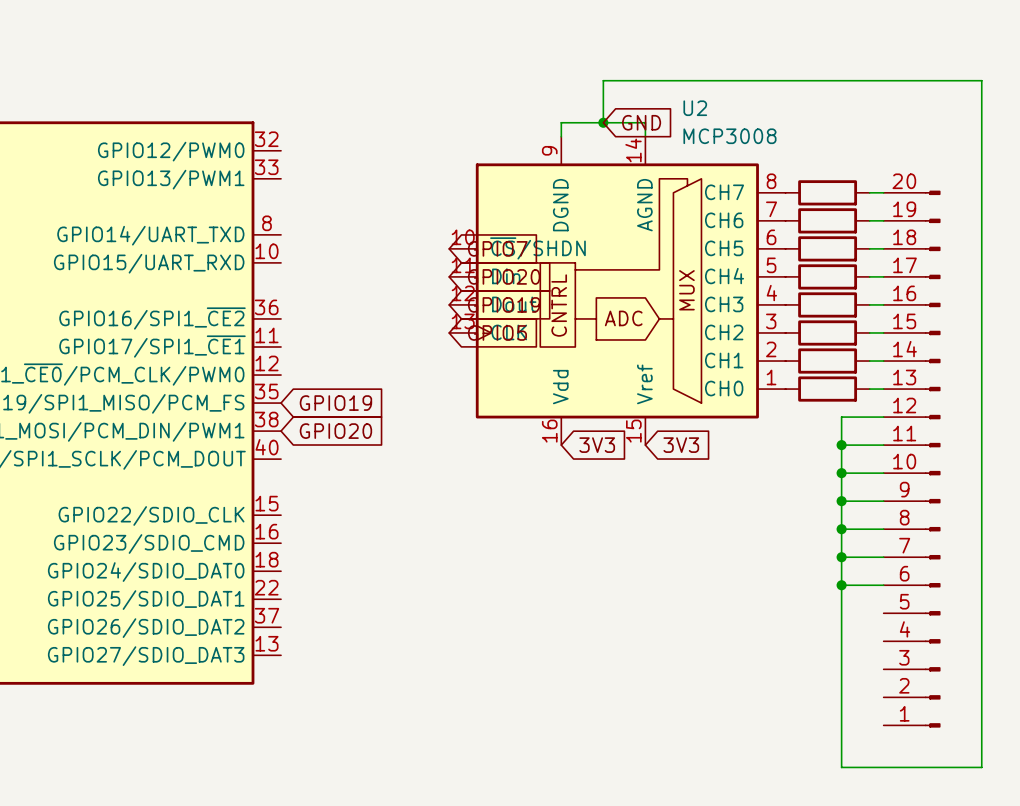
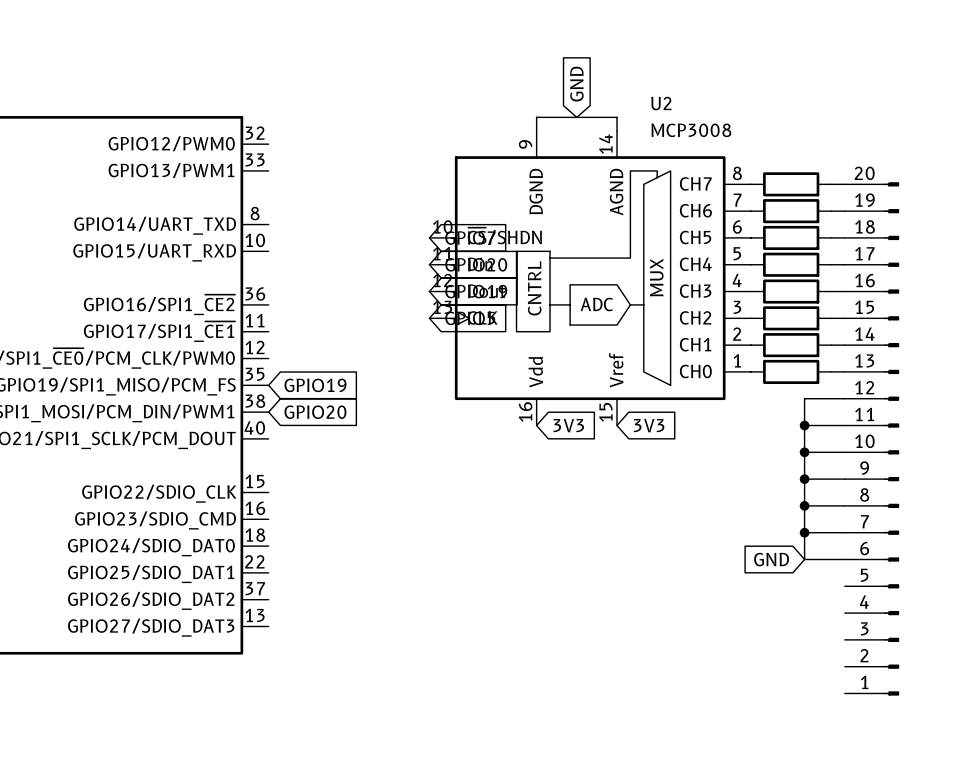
wire: (603, 122) (603, 80) (981, 80) (981, 767) (841, 767) (841, 585) -> none
junction: (603, 122) -> none
global label rotation: 0° (641, 122) -> 90° counterclockwise (576, 84)
global label: none -> GND (771, 559)
junction: (841, 585) -> none

